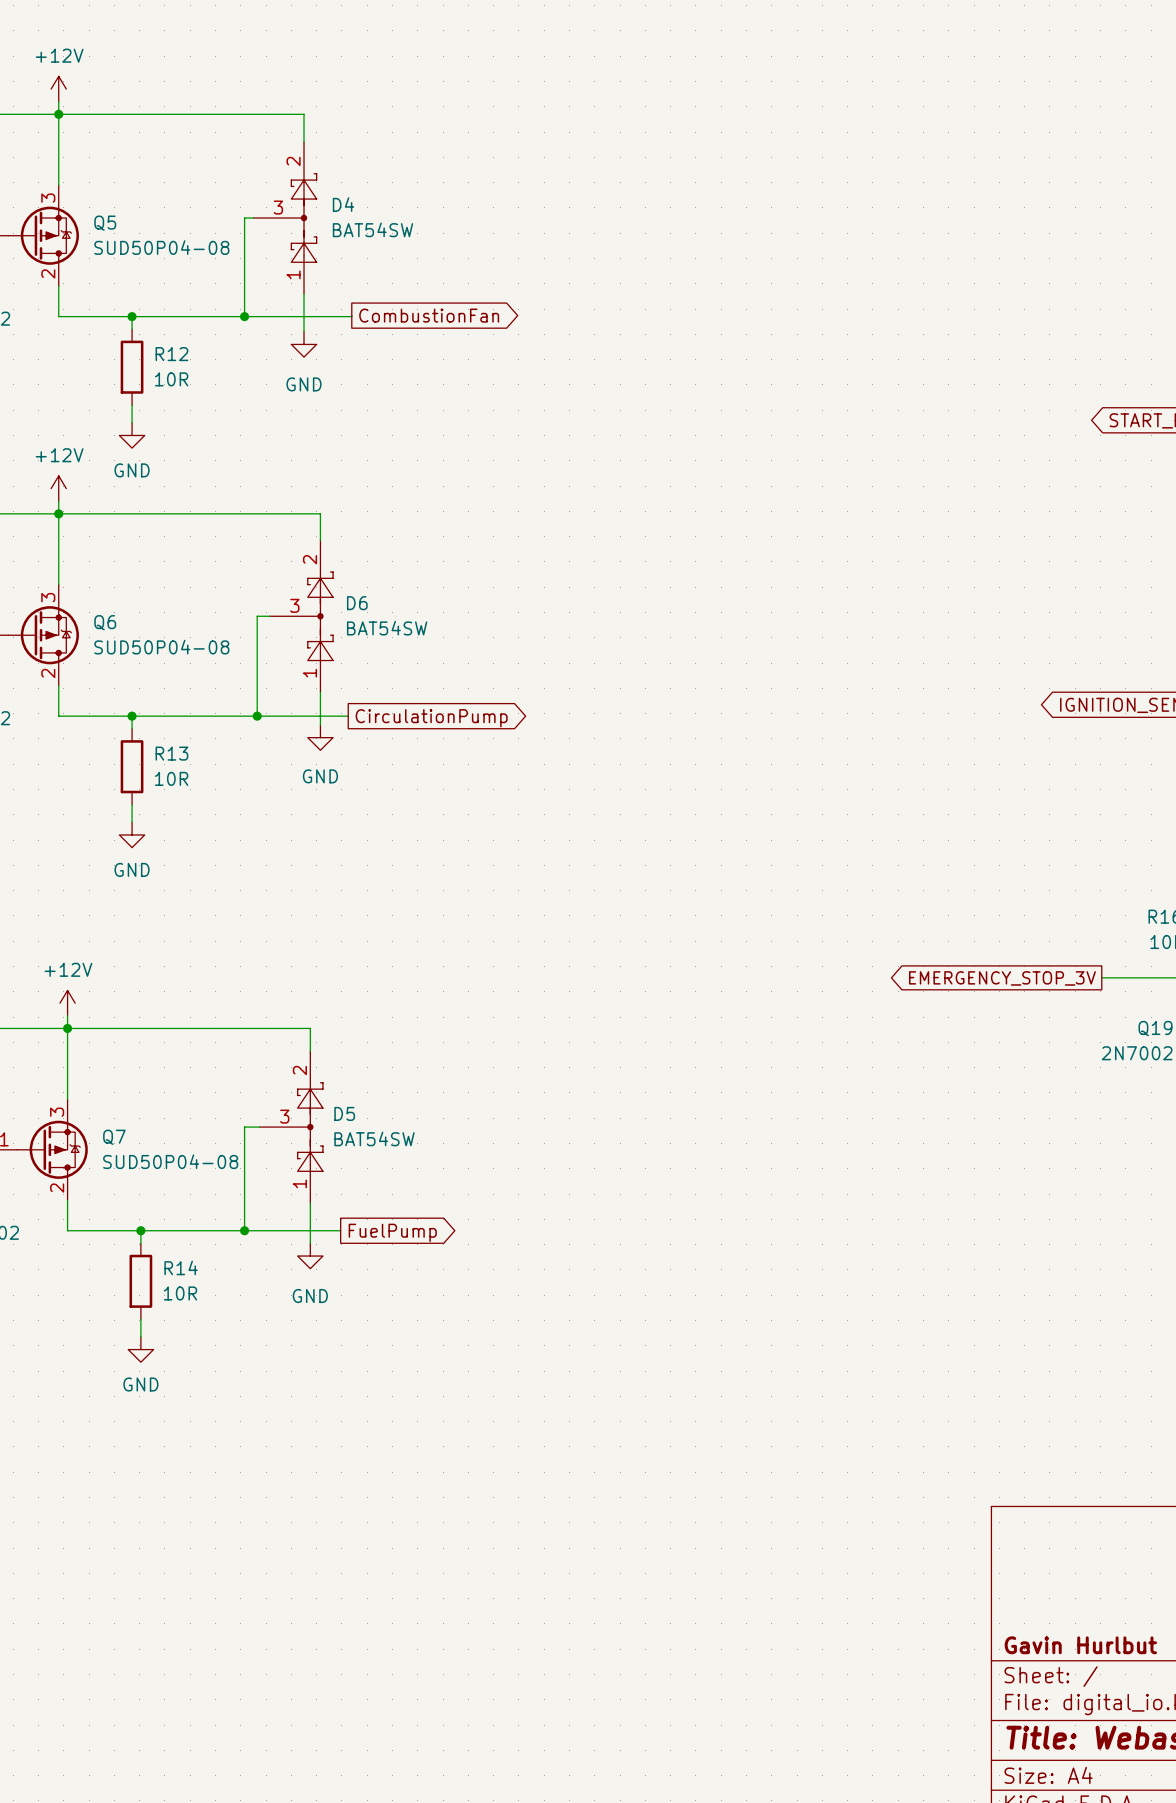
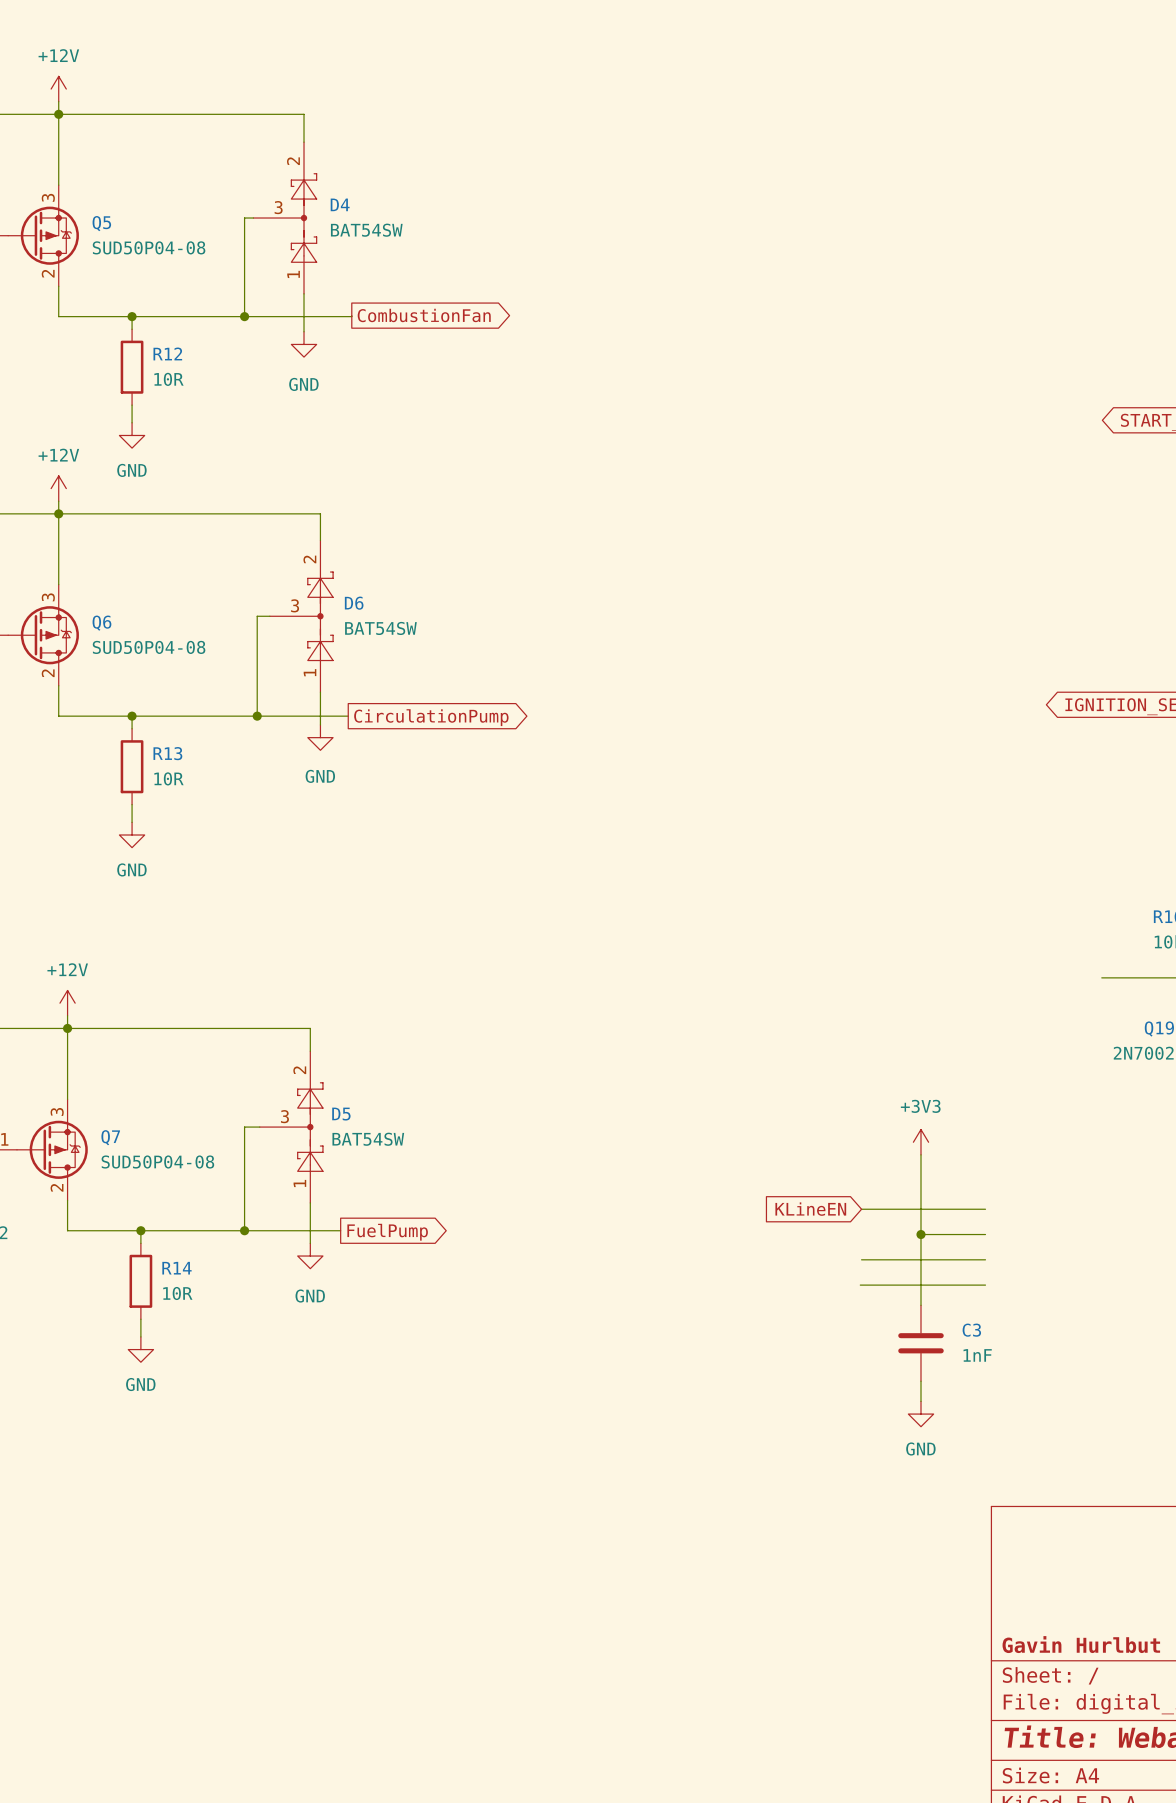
global label: EMERGENCY_STOP_3V (1002, 978) -> none
power symbol: none -> +3V3 (920, 1142)
wire: none -> (920, 1154) (920, 1305)
global label: none -> KLineEN (810, 1209)
wire: none -> (861, 1209) (985, 1209)
wire: none -> (920, 1234) (985, 1234)
junction: none -> (920, 1234)
wire: none -> (861, 1259) (985, 1259)
wire: none -> (860, 1285) (985, 1285)
C3: none -> 1nF (920, 1343)
wire: none -> (920, 1381) (920, 1401)
power symbol: none -> GND (920, 1414)

